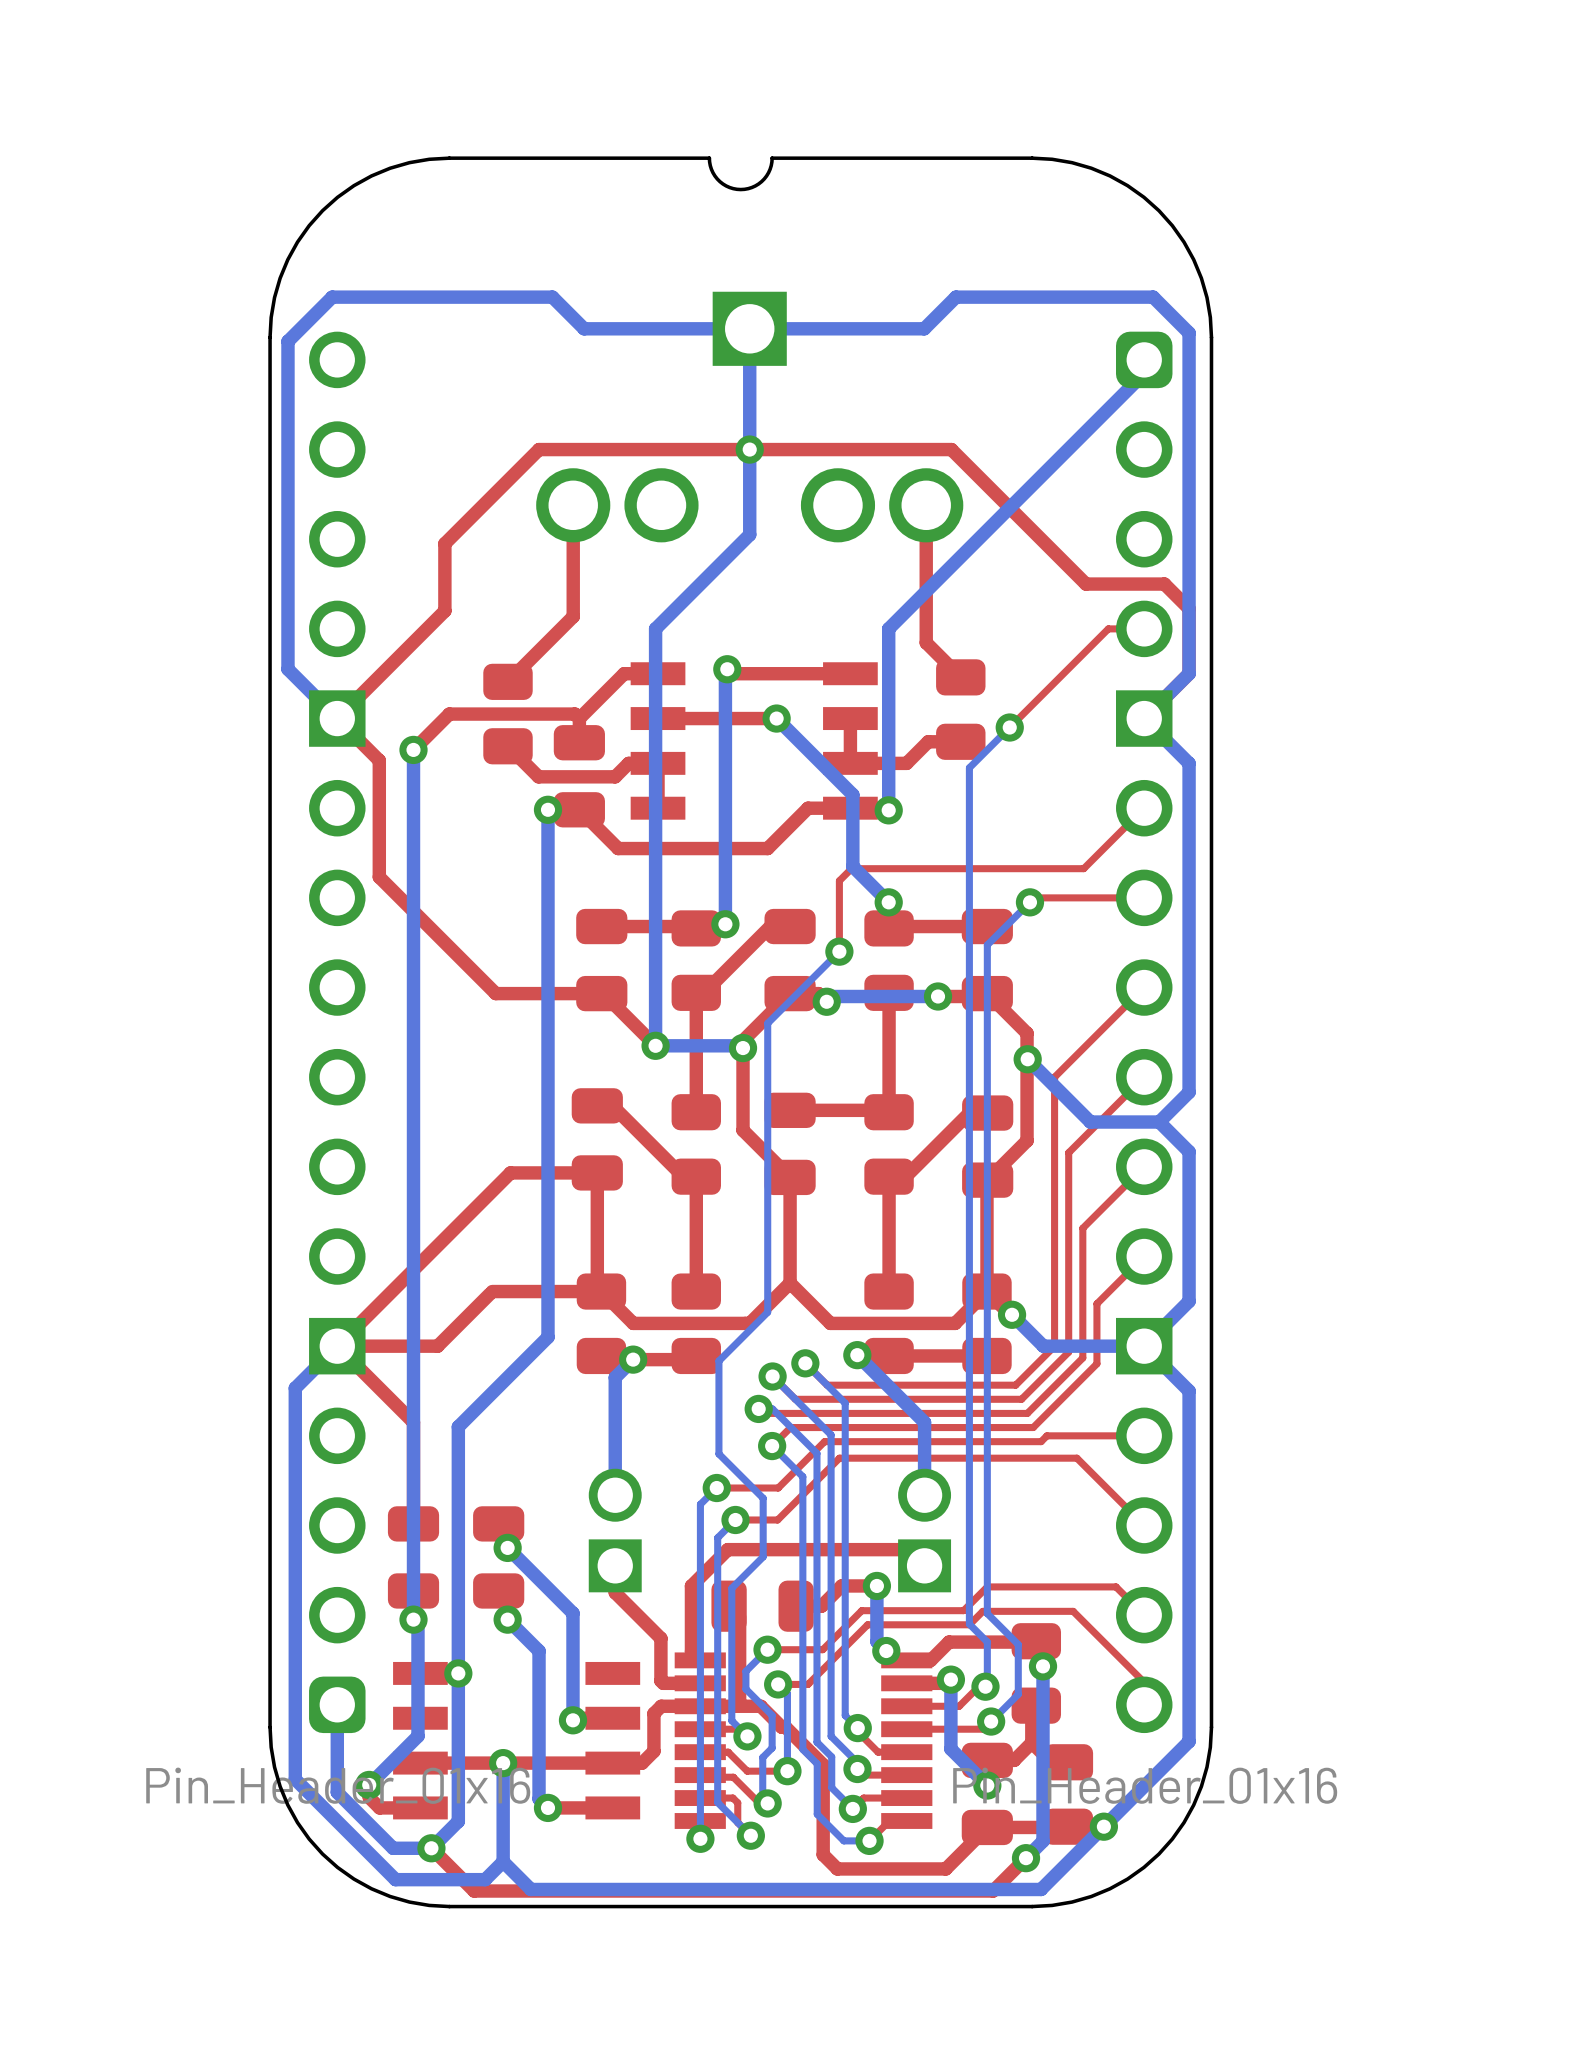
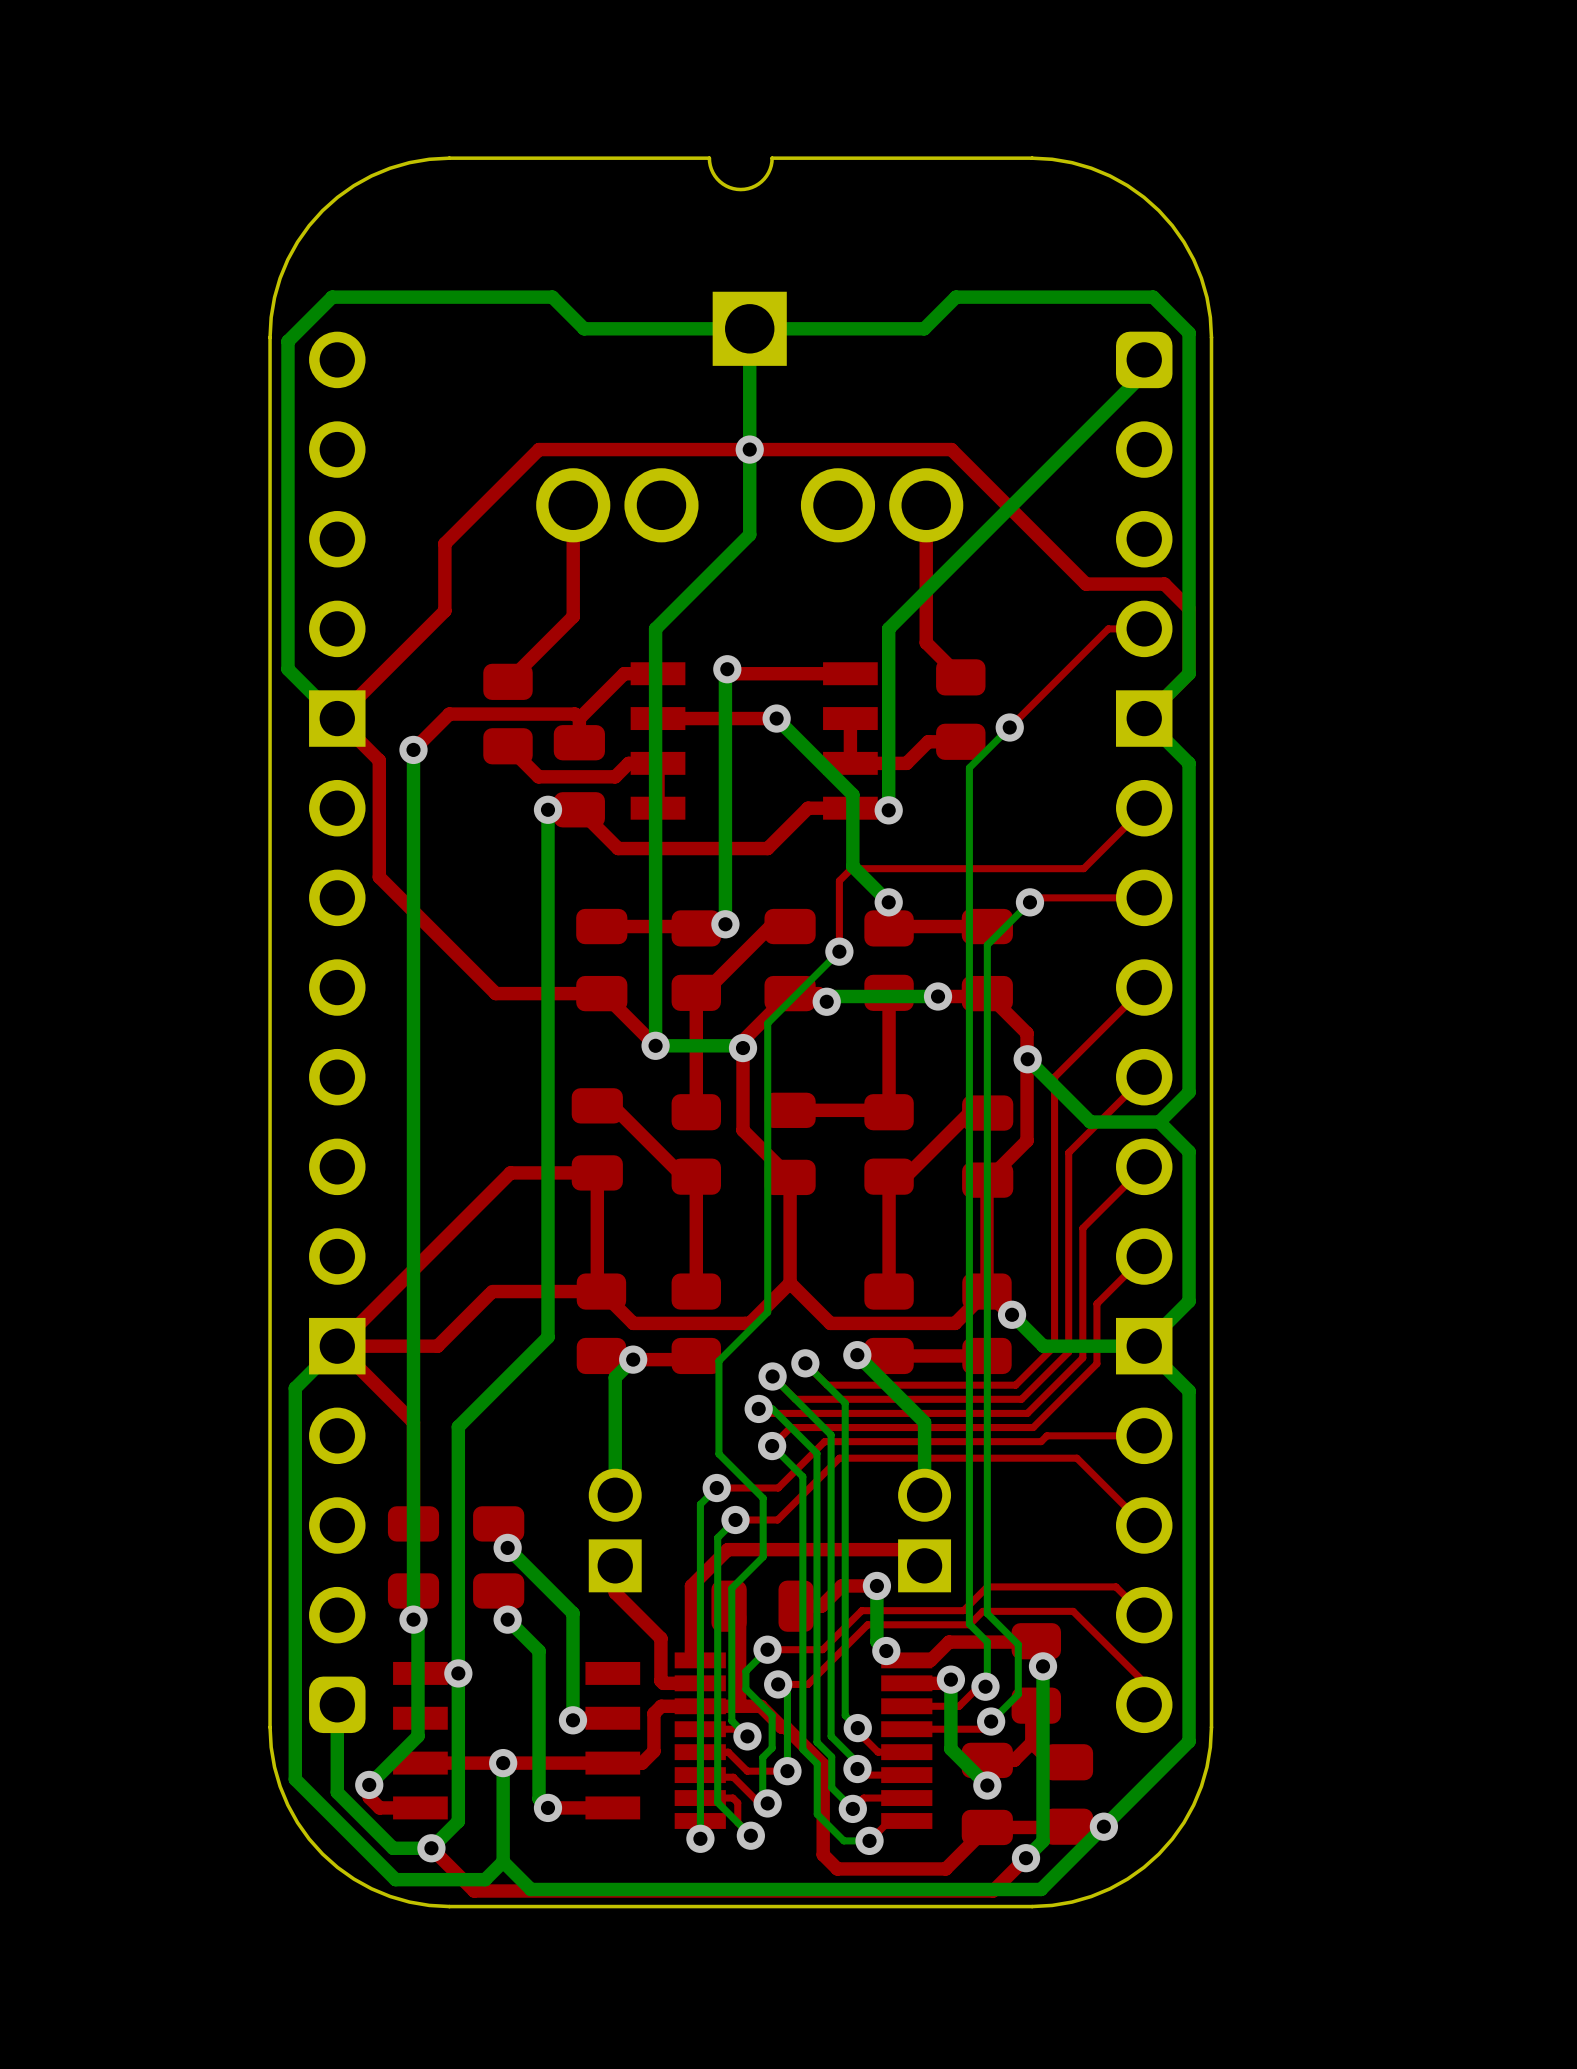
drawing: [146, 1767, 531, 1804] -> none
drawing: [953, 1767, 1338, 1804] -> none

